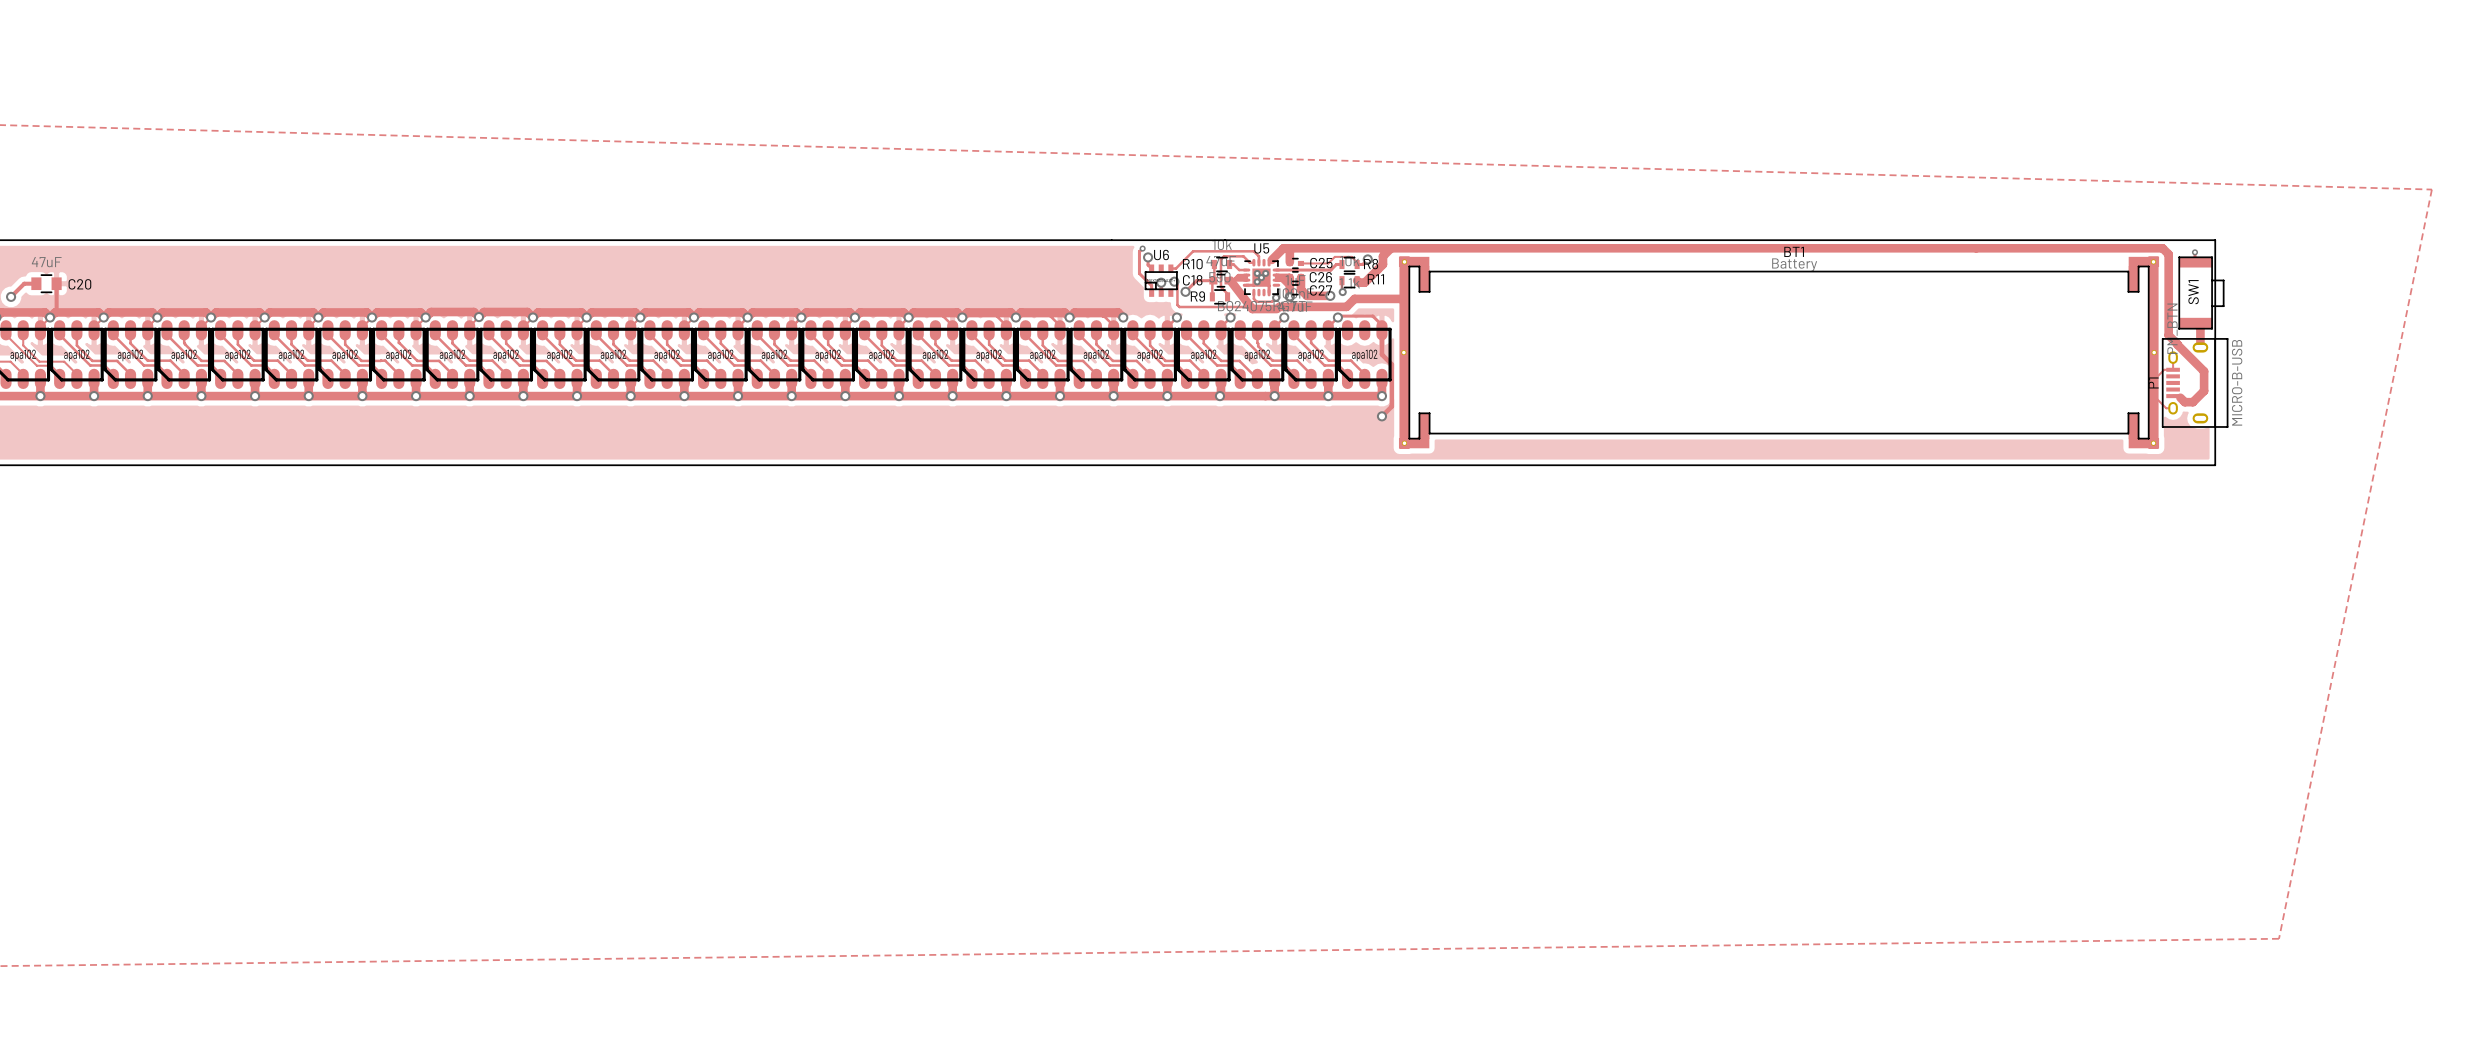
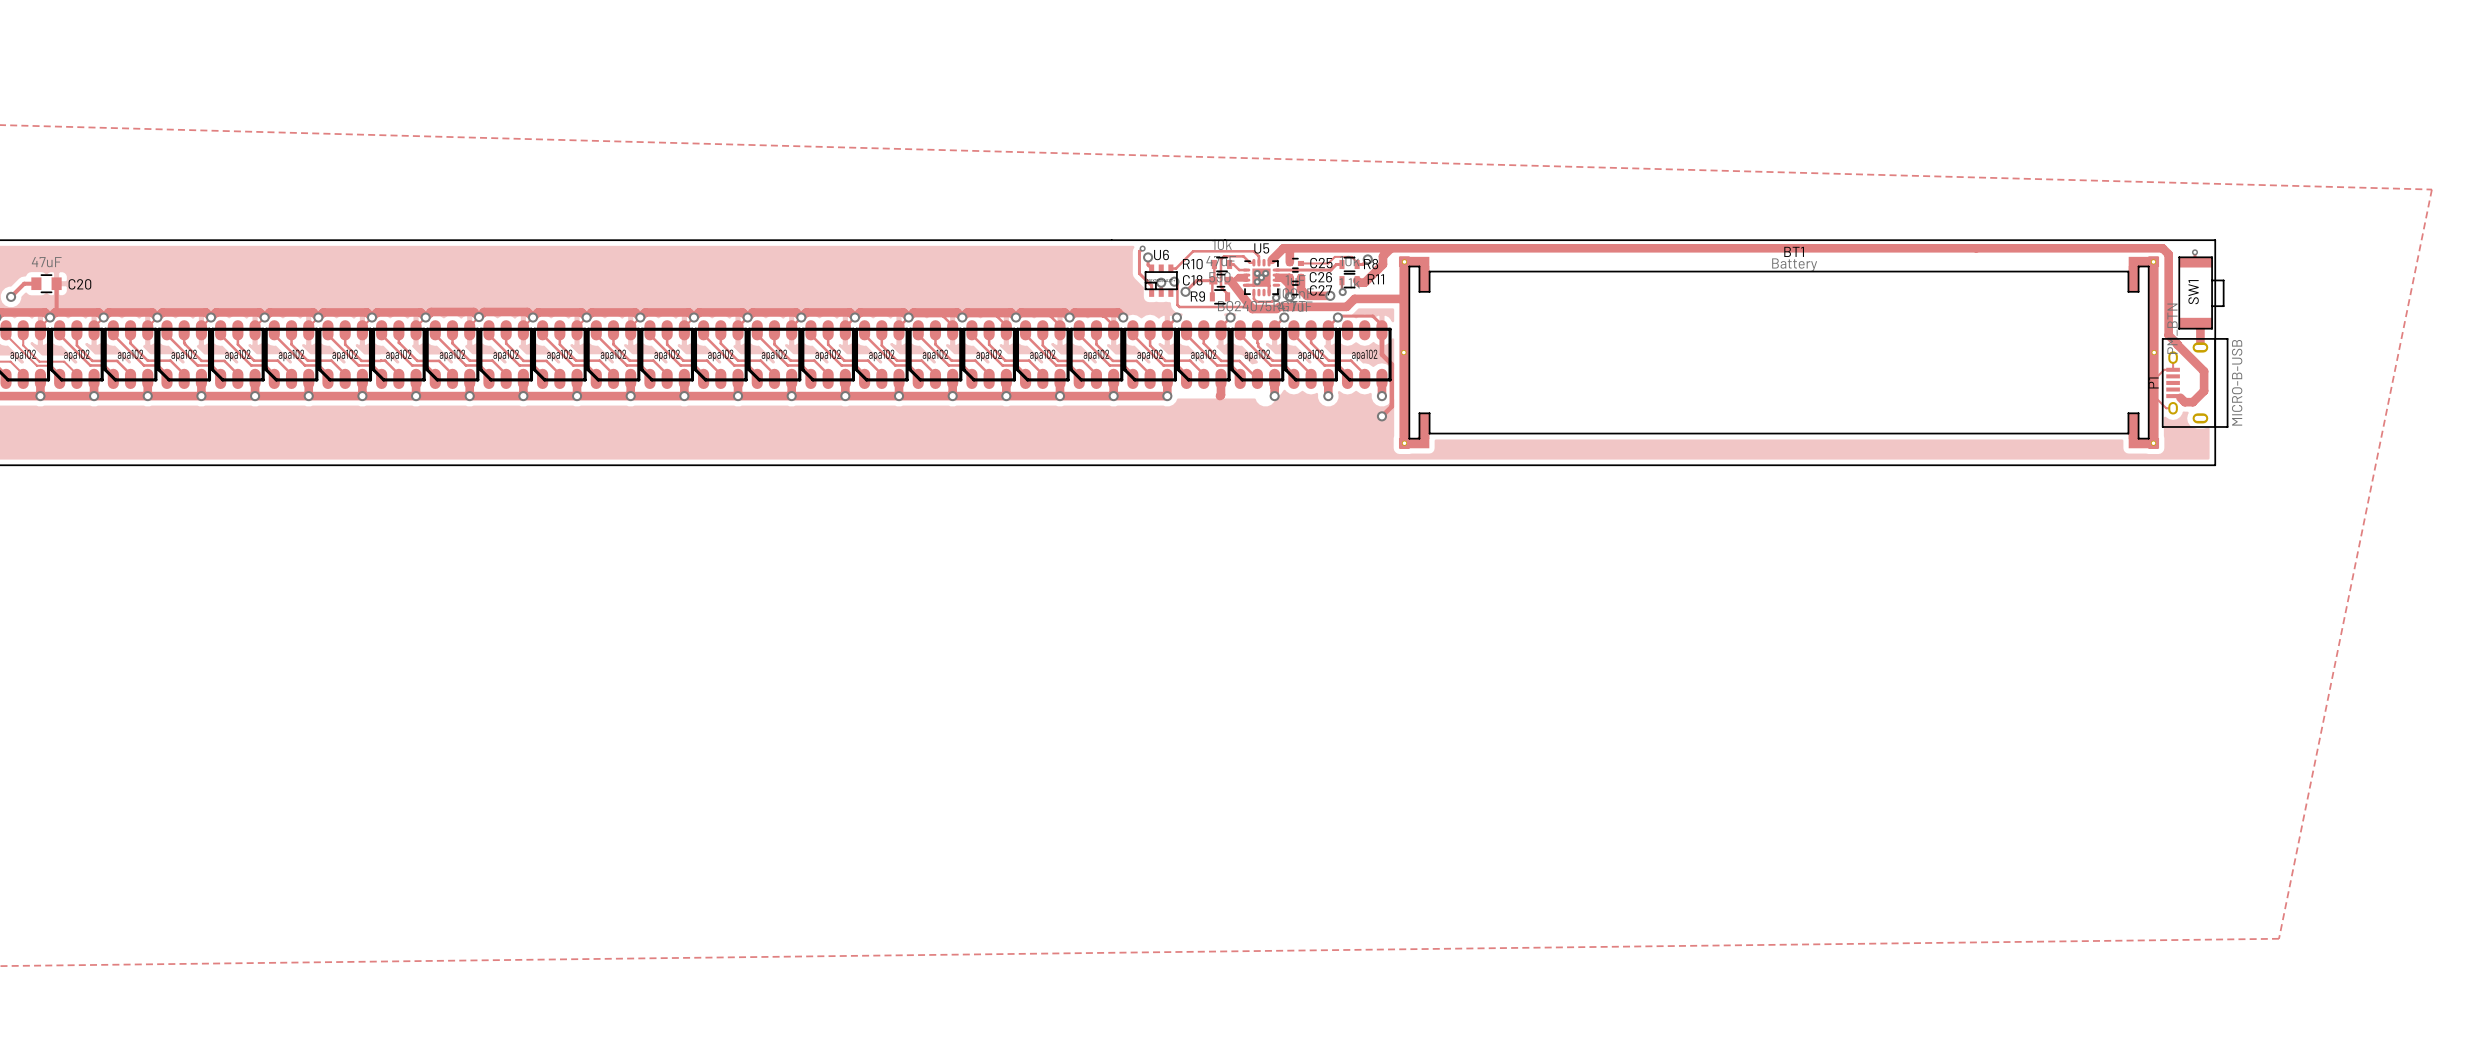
track: (1167, 396) (1381, 396) -> none
via: (1219, 396) -> none

